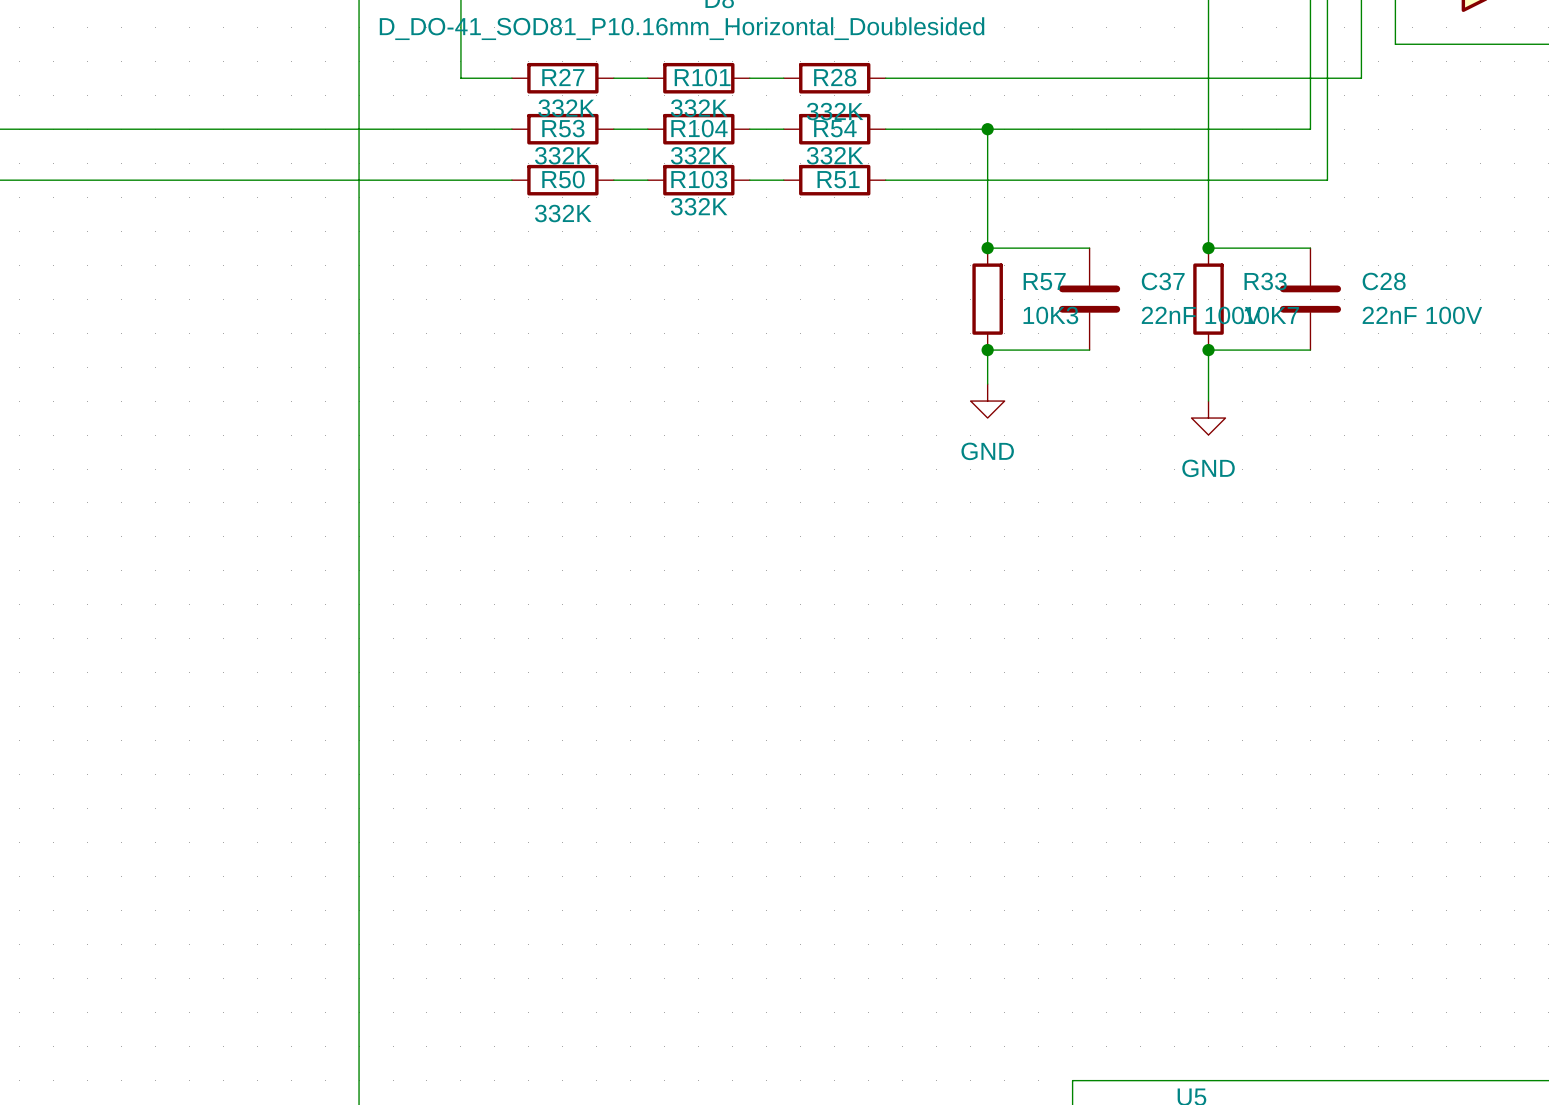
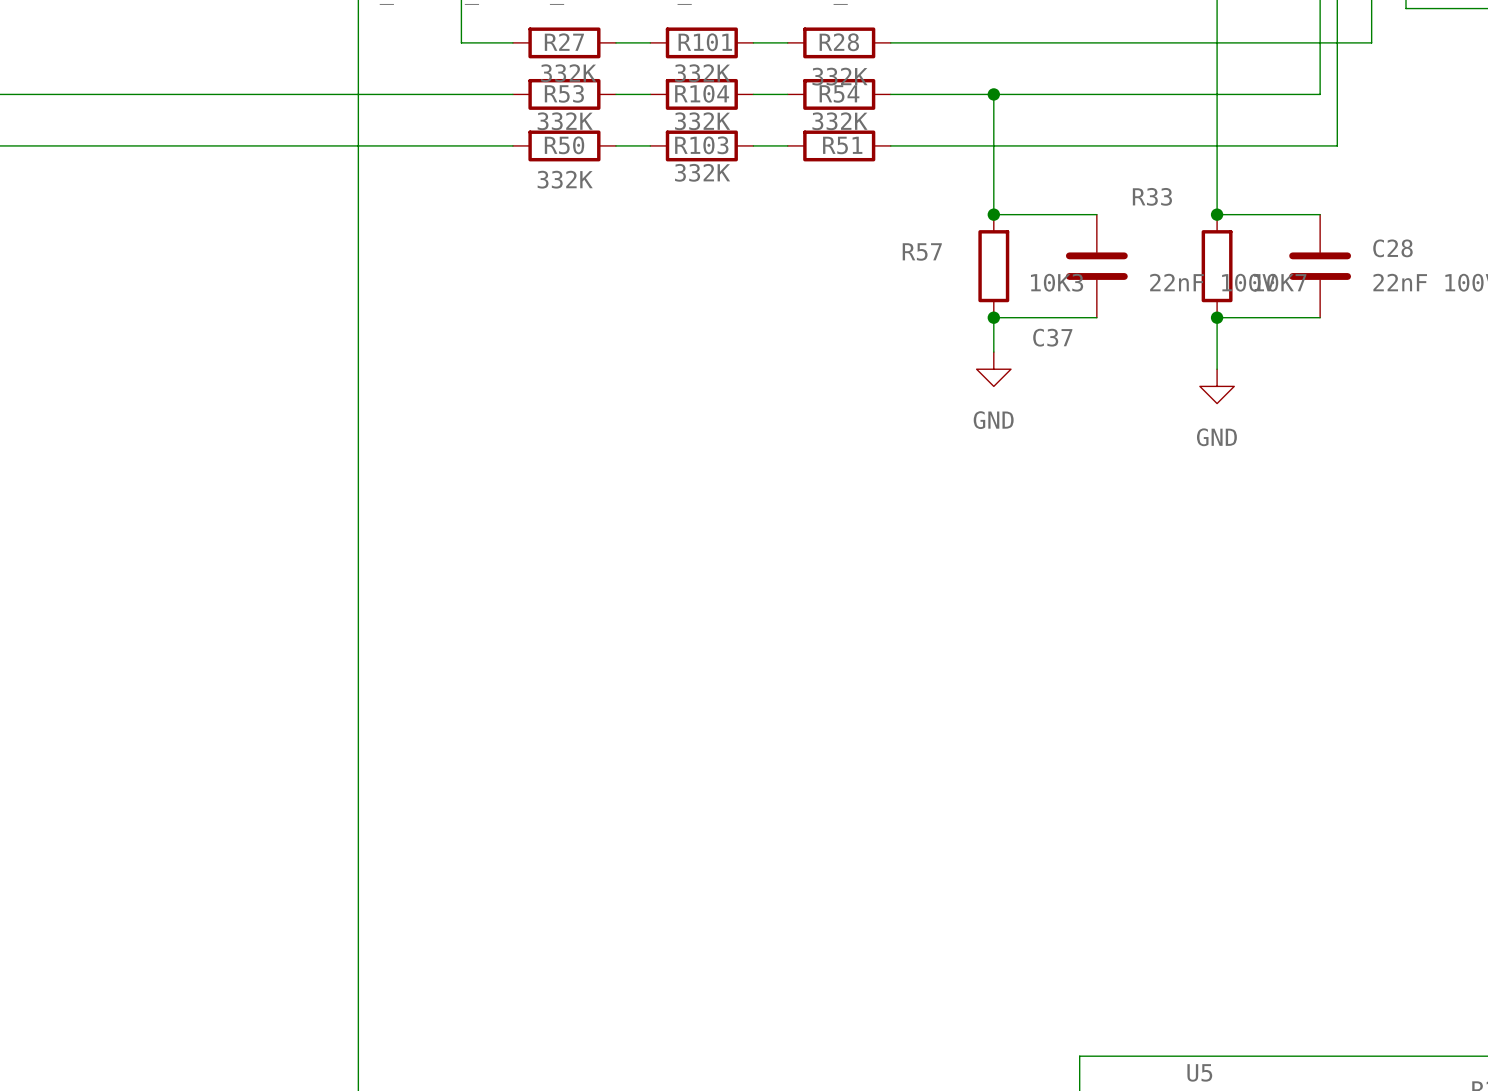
R57 name position: R57 (1044, 281) -> R57 (922, 251)
C37 name position: C37 (1163, 281) -> C37 (1052, 337)
R33 name position: R33 (1265, 281) -> R33 (1152, 196)

